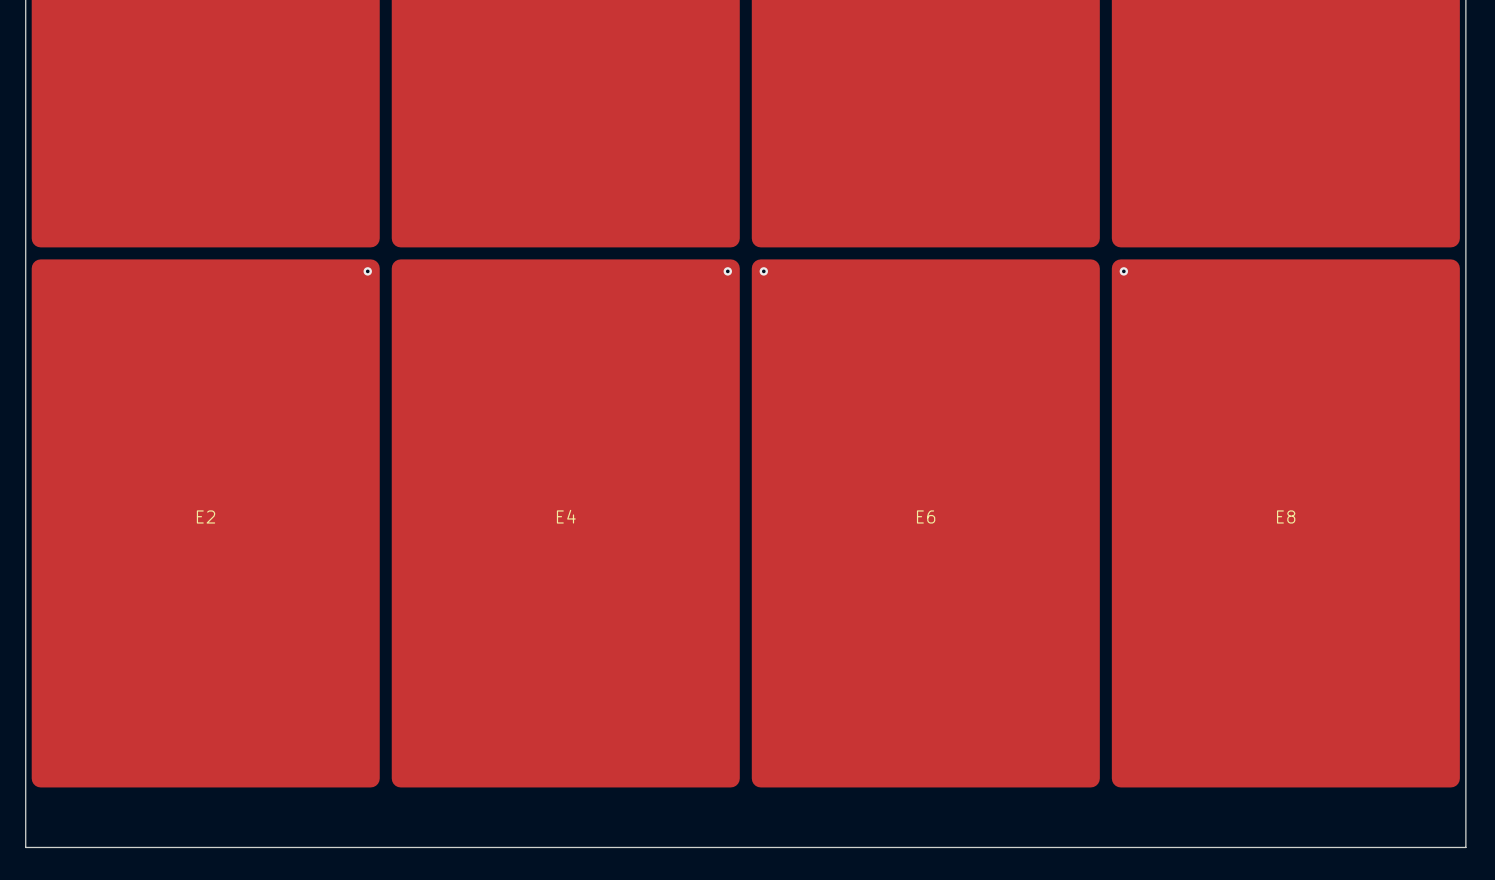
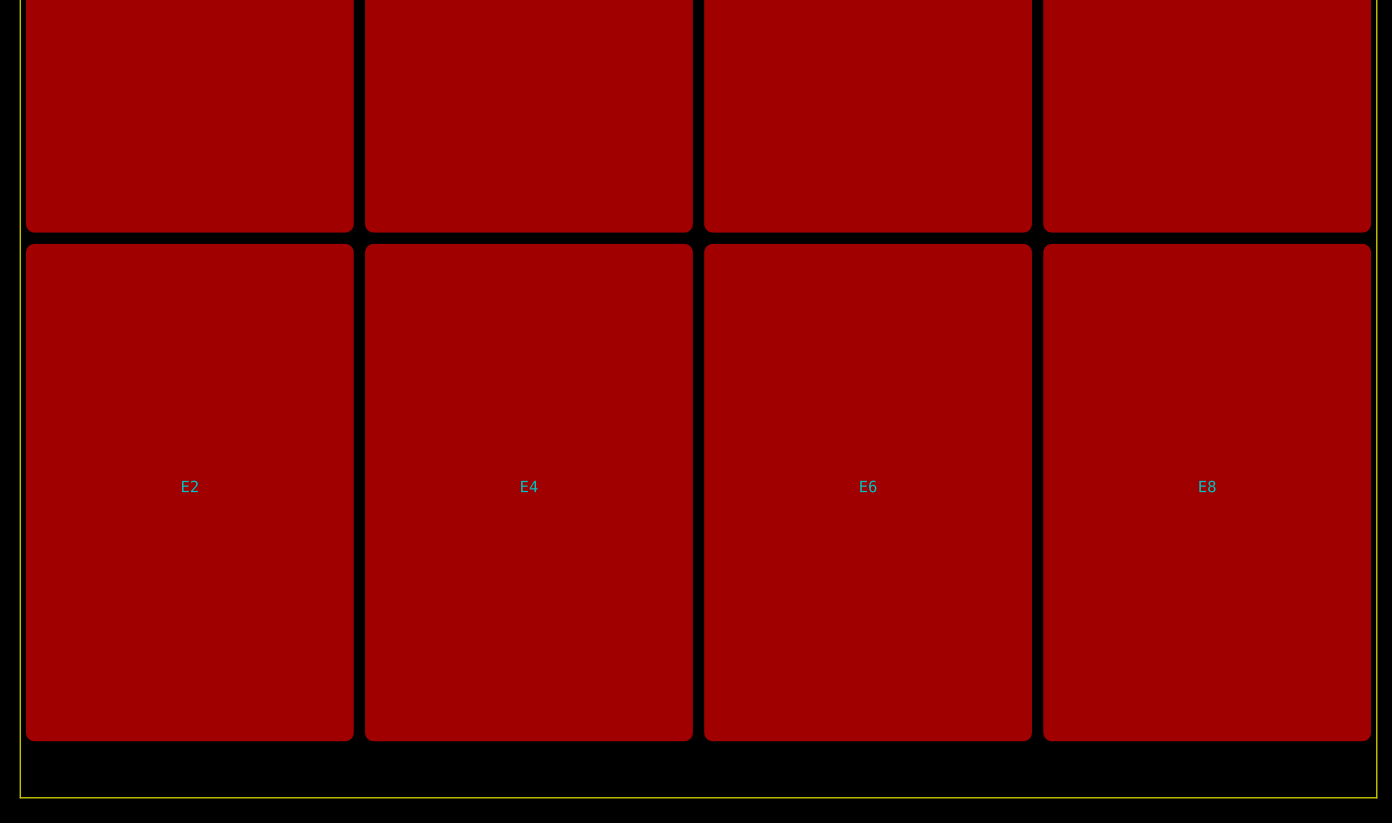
via: (367, 271) -> none
via: (727, 271) -> none
via: (763, 271) -> none
via: (1123, 271) -> none

